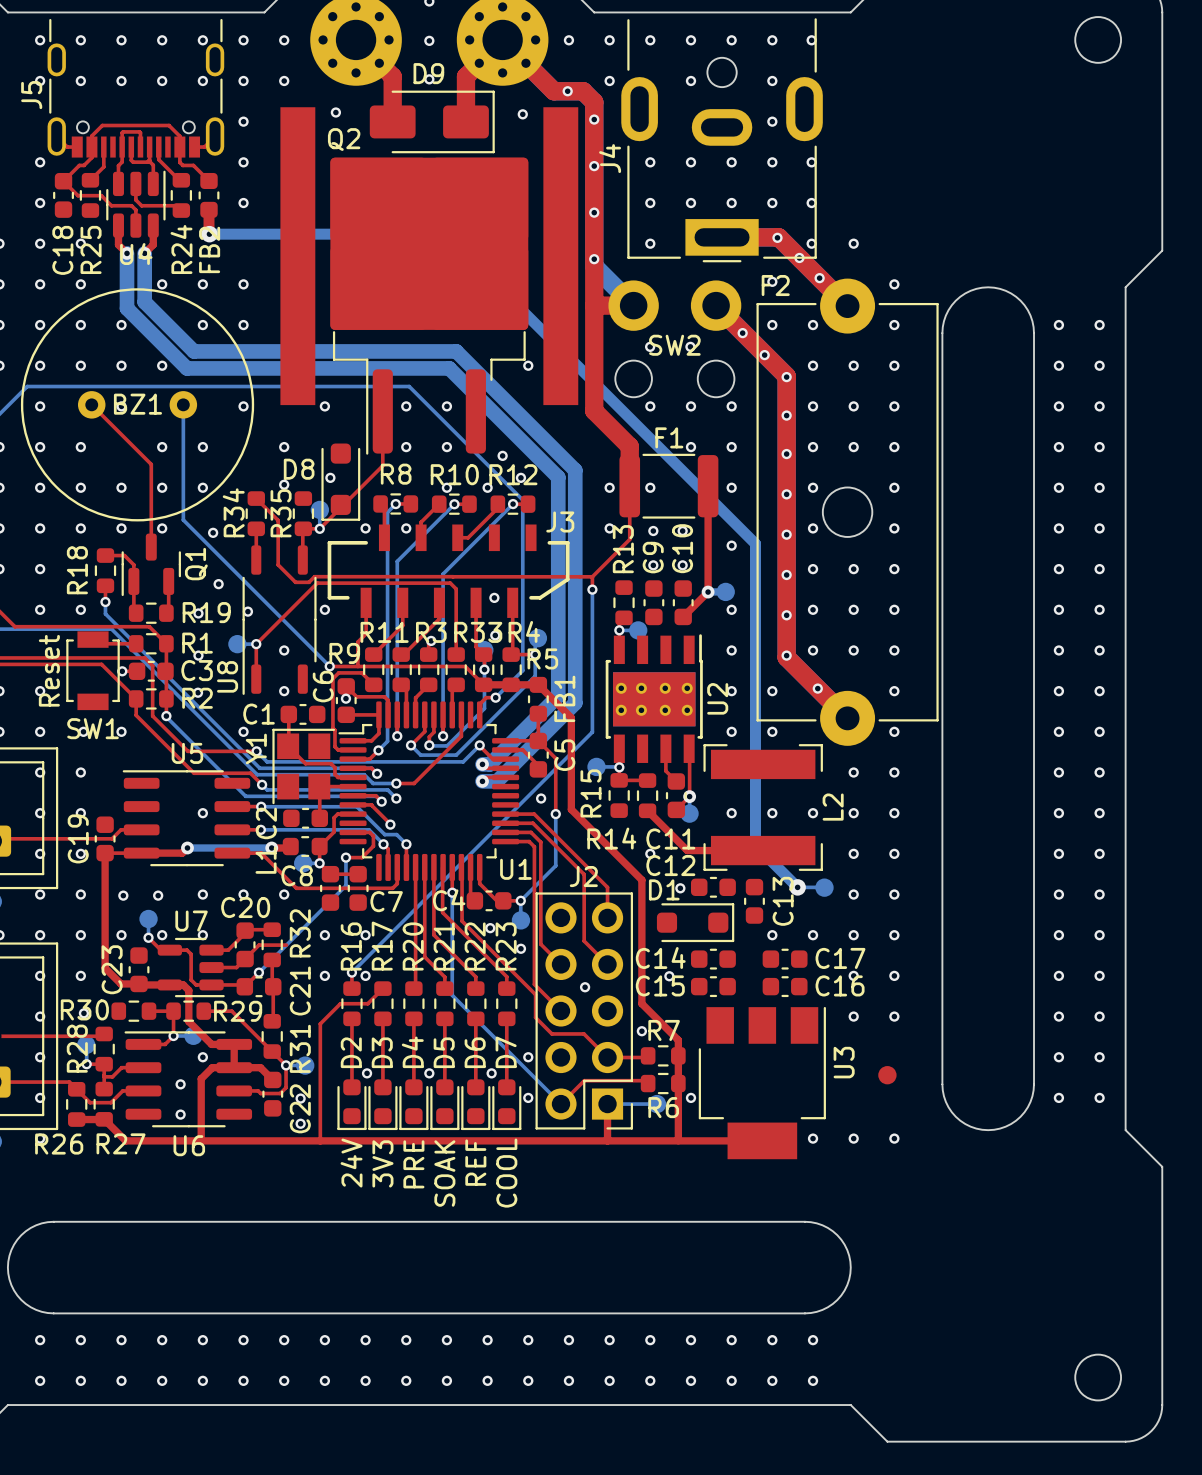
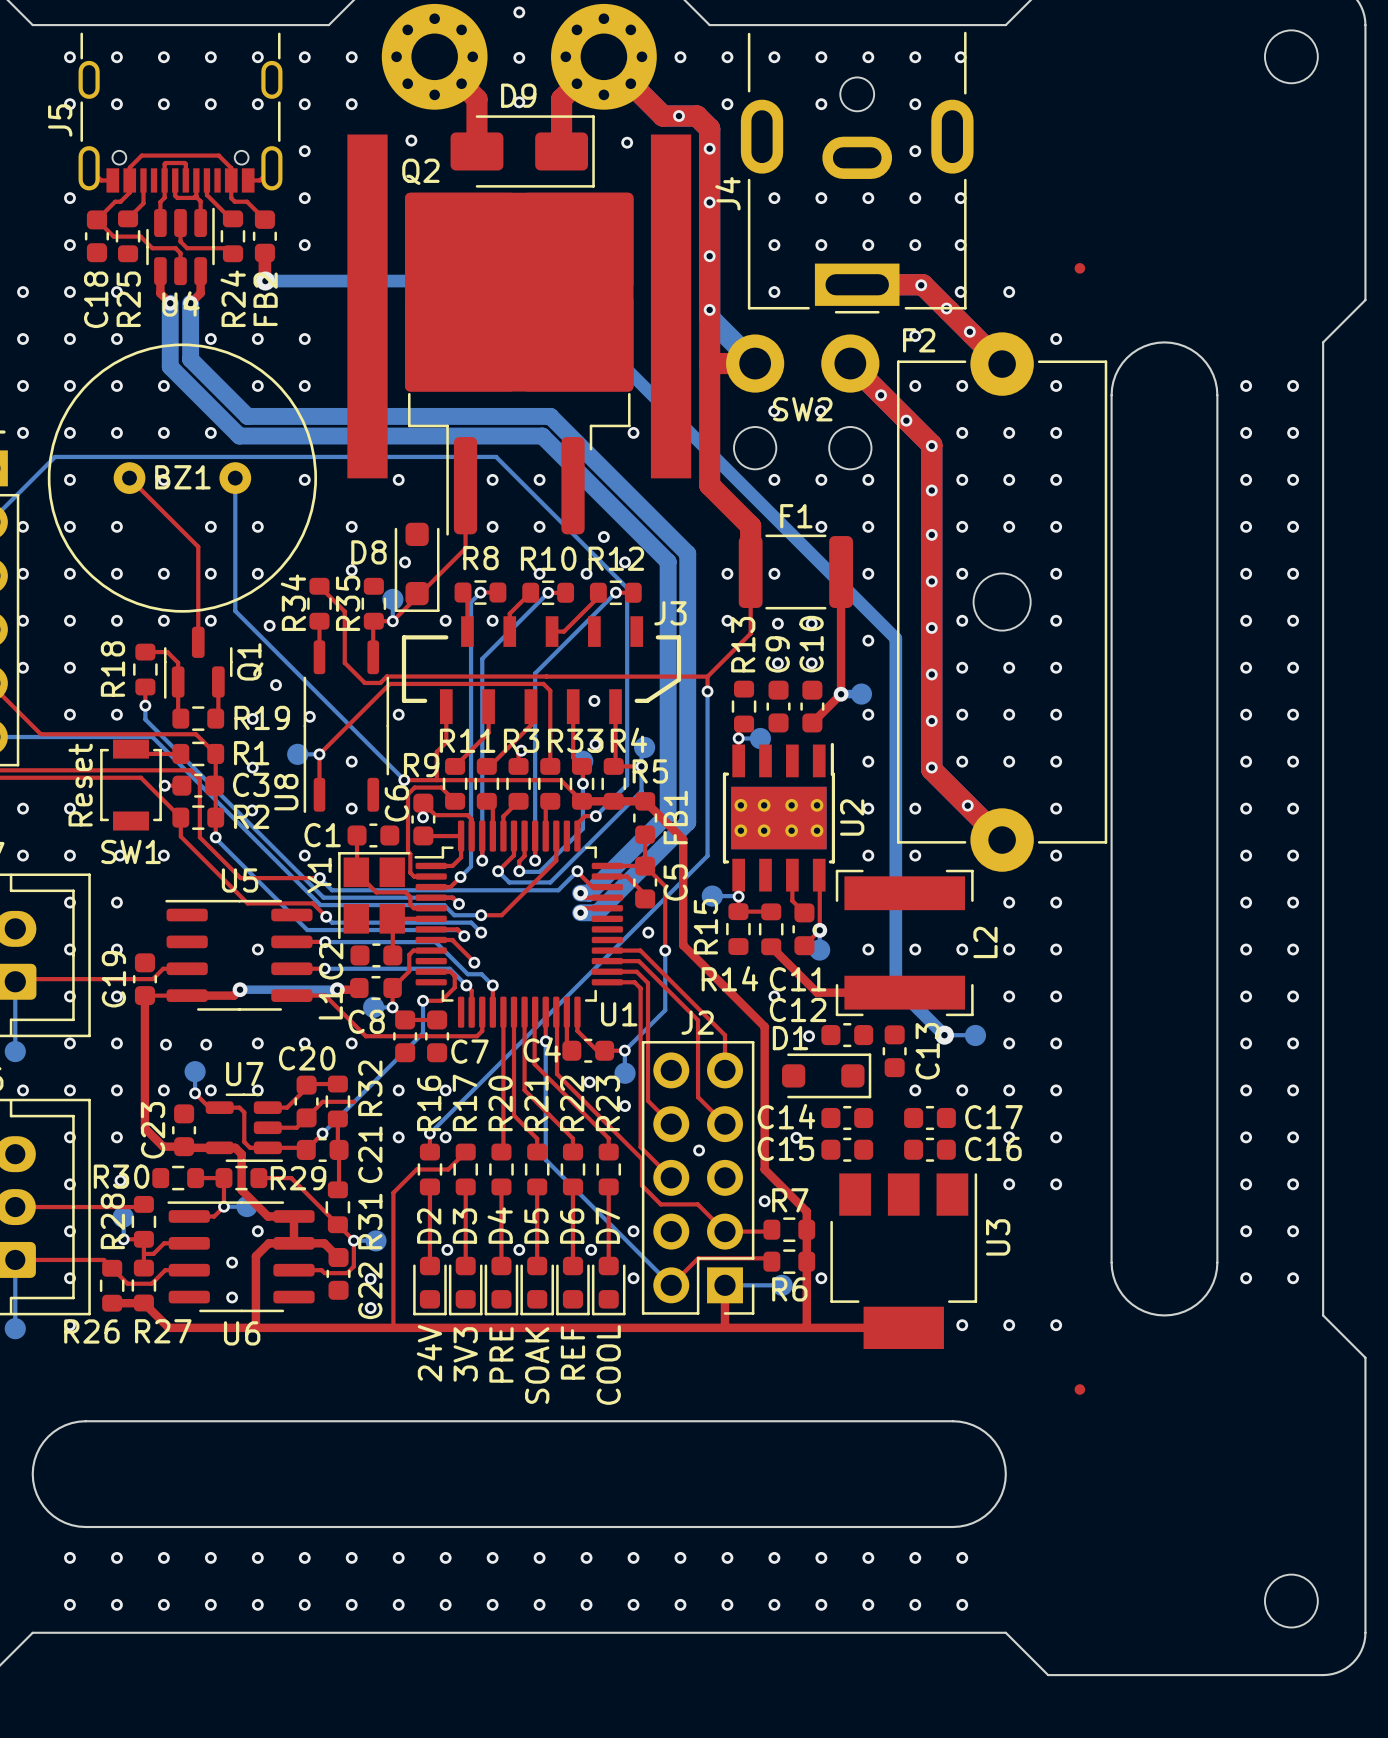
part: none -> (1079, 268)
part: (887, 1075) -> none
part: none -> (1079, 1389)

